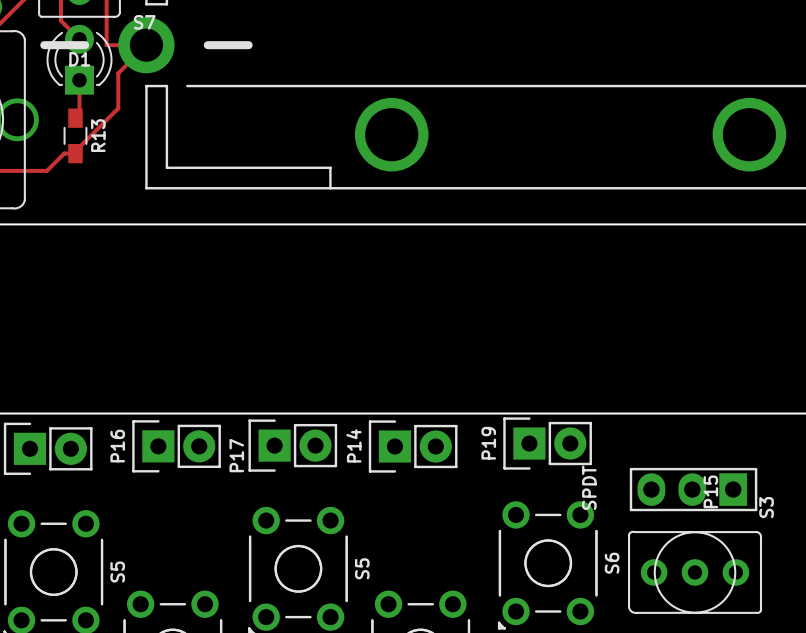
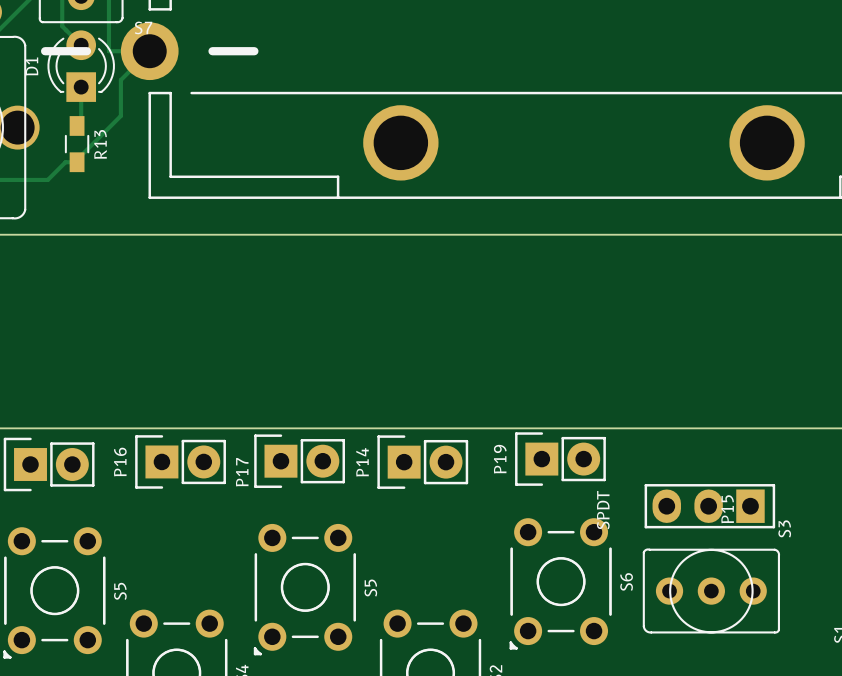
D1 name rotation: 0° (79, 59) -> 90° counterclockwise (31, 66)
D1 name position: D1 (79, 59) -> D1 (31, 66)

